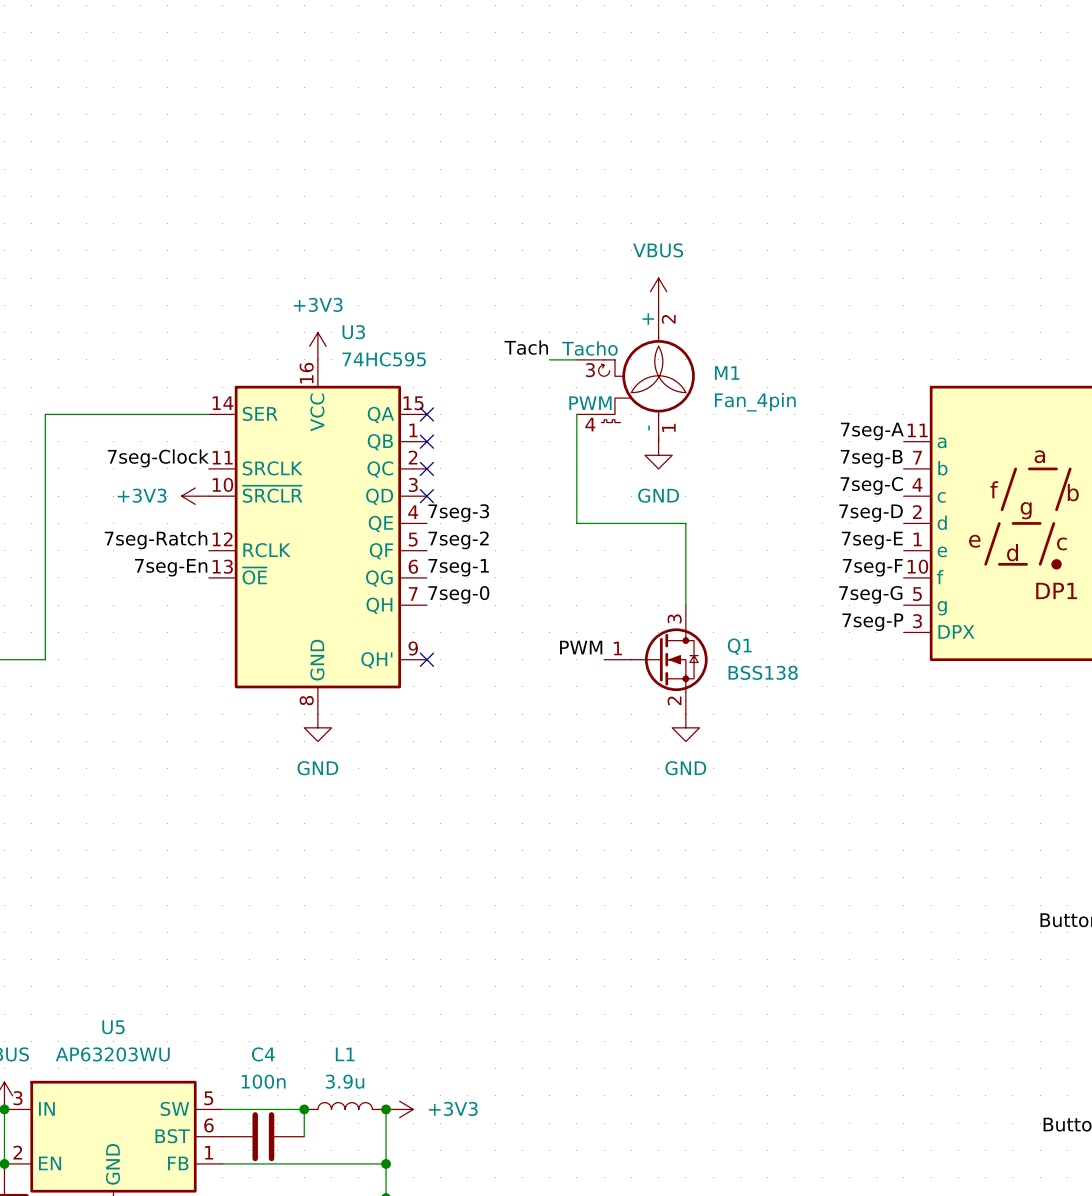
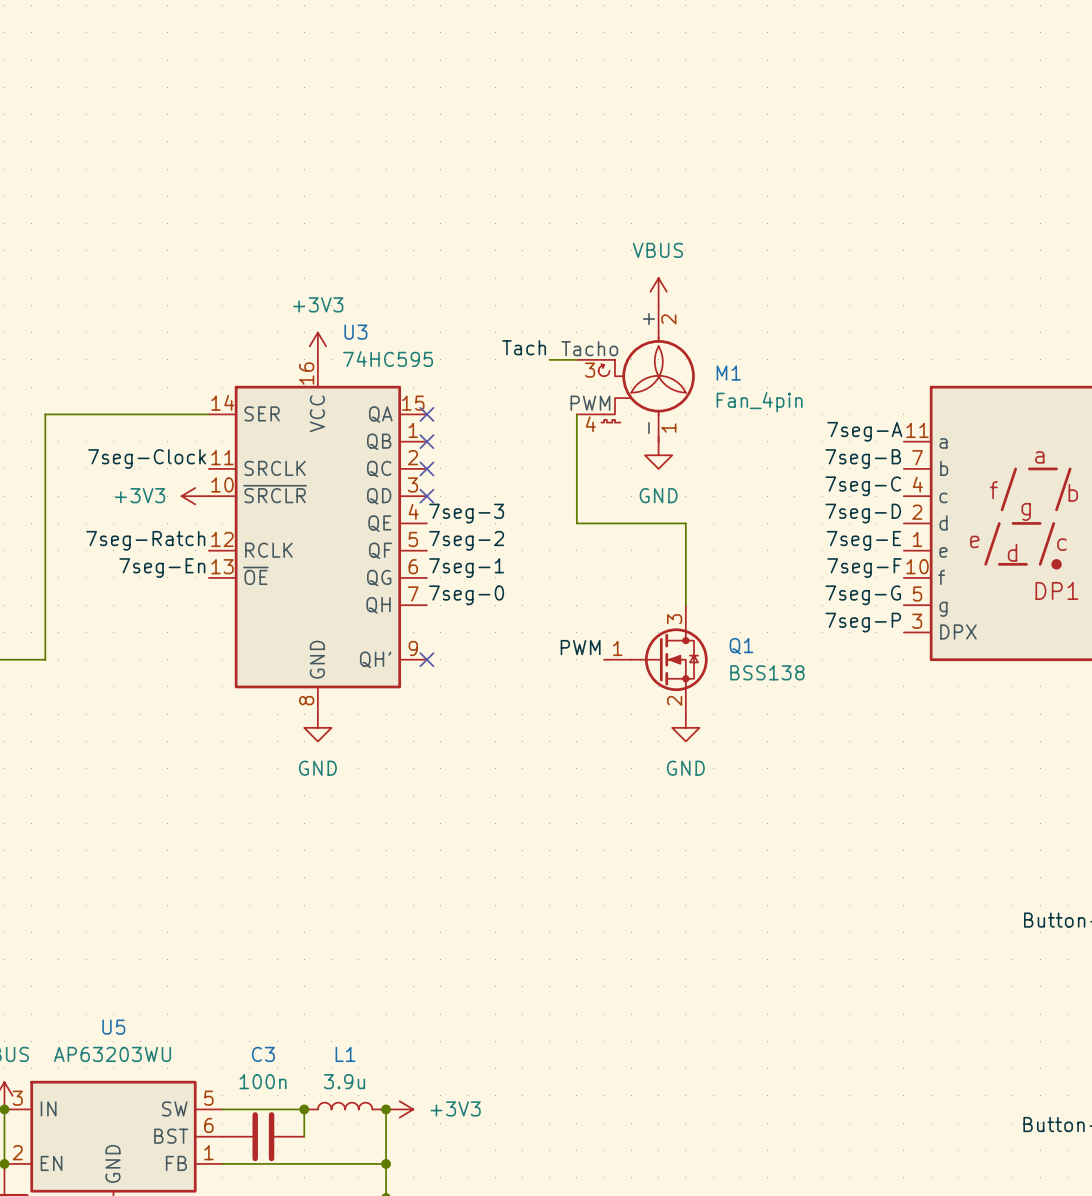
C4 name: C4 (263, 1054) -> C3 (263, 1054)

